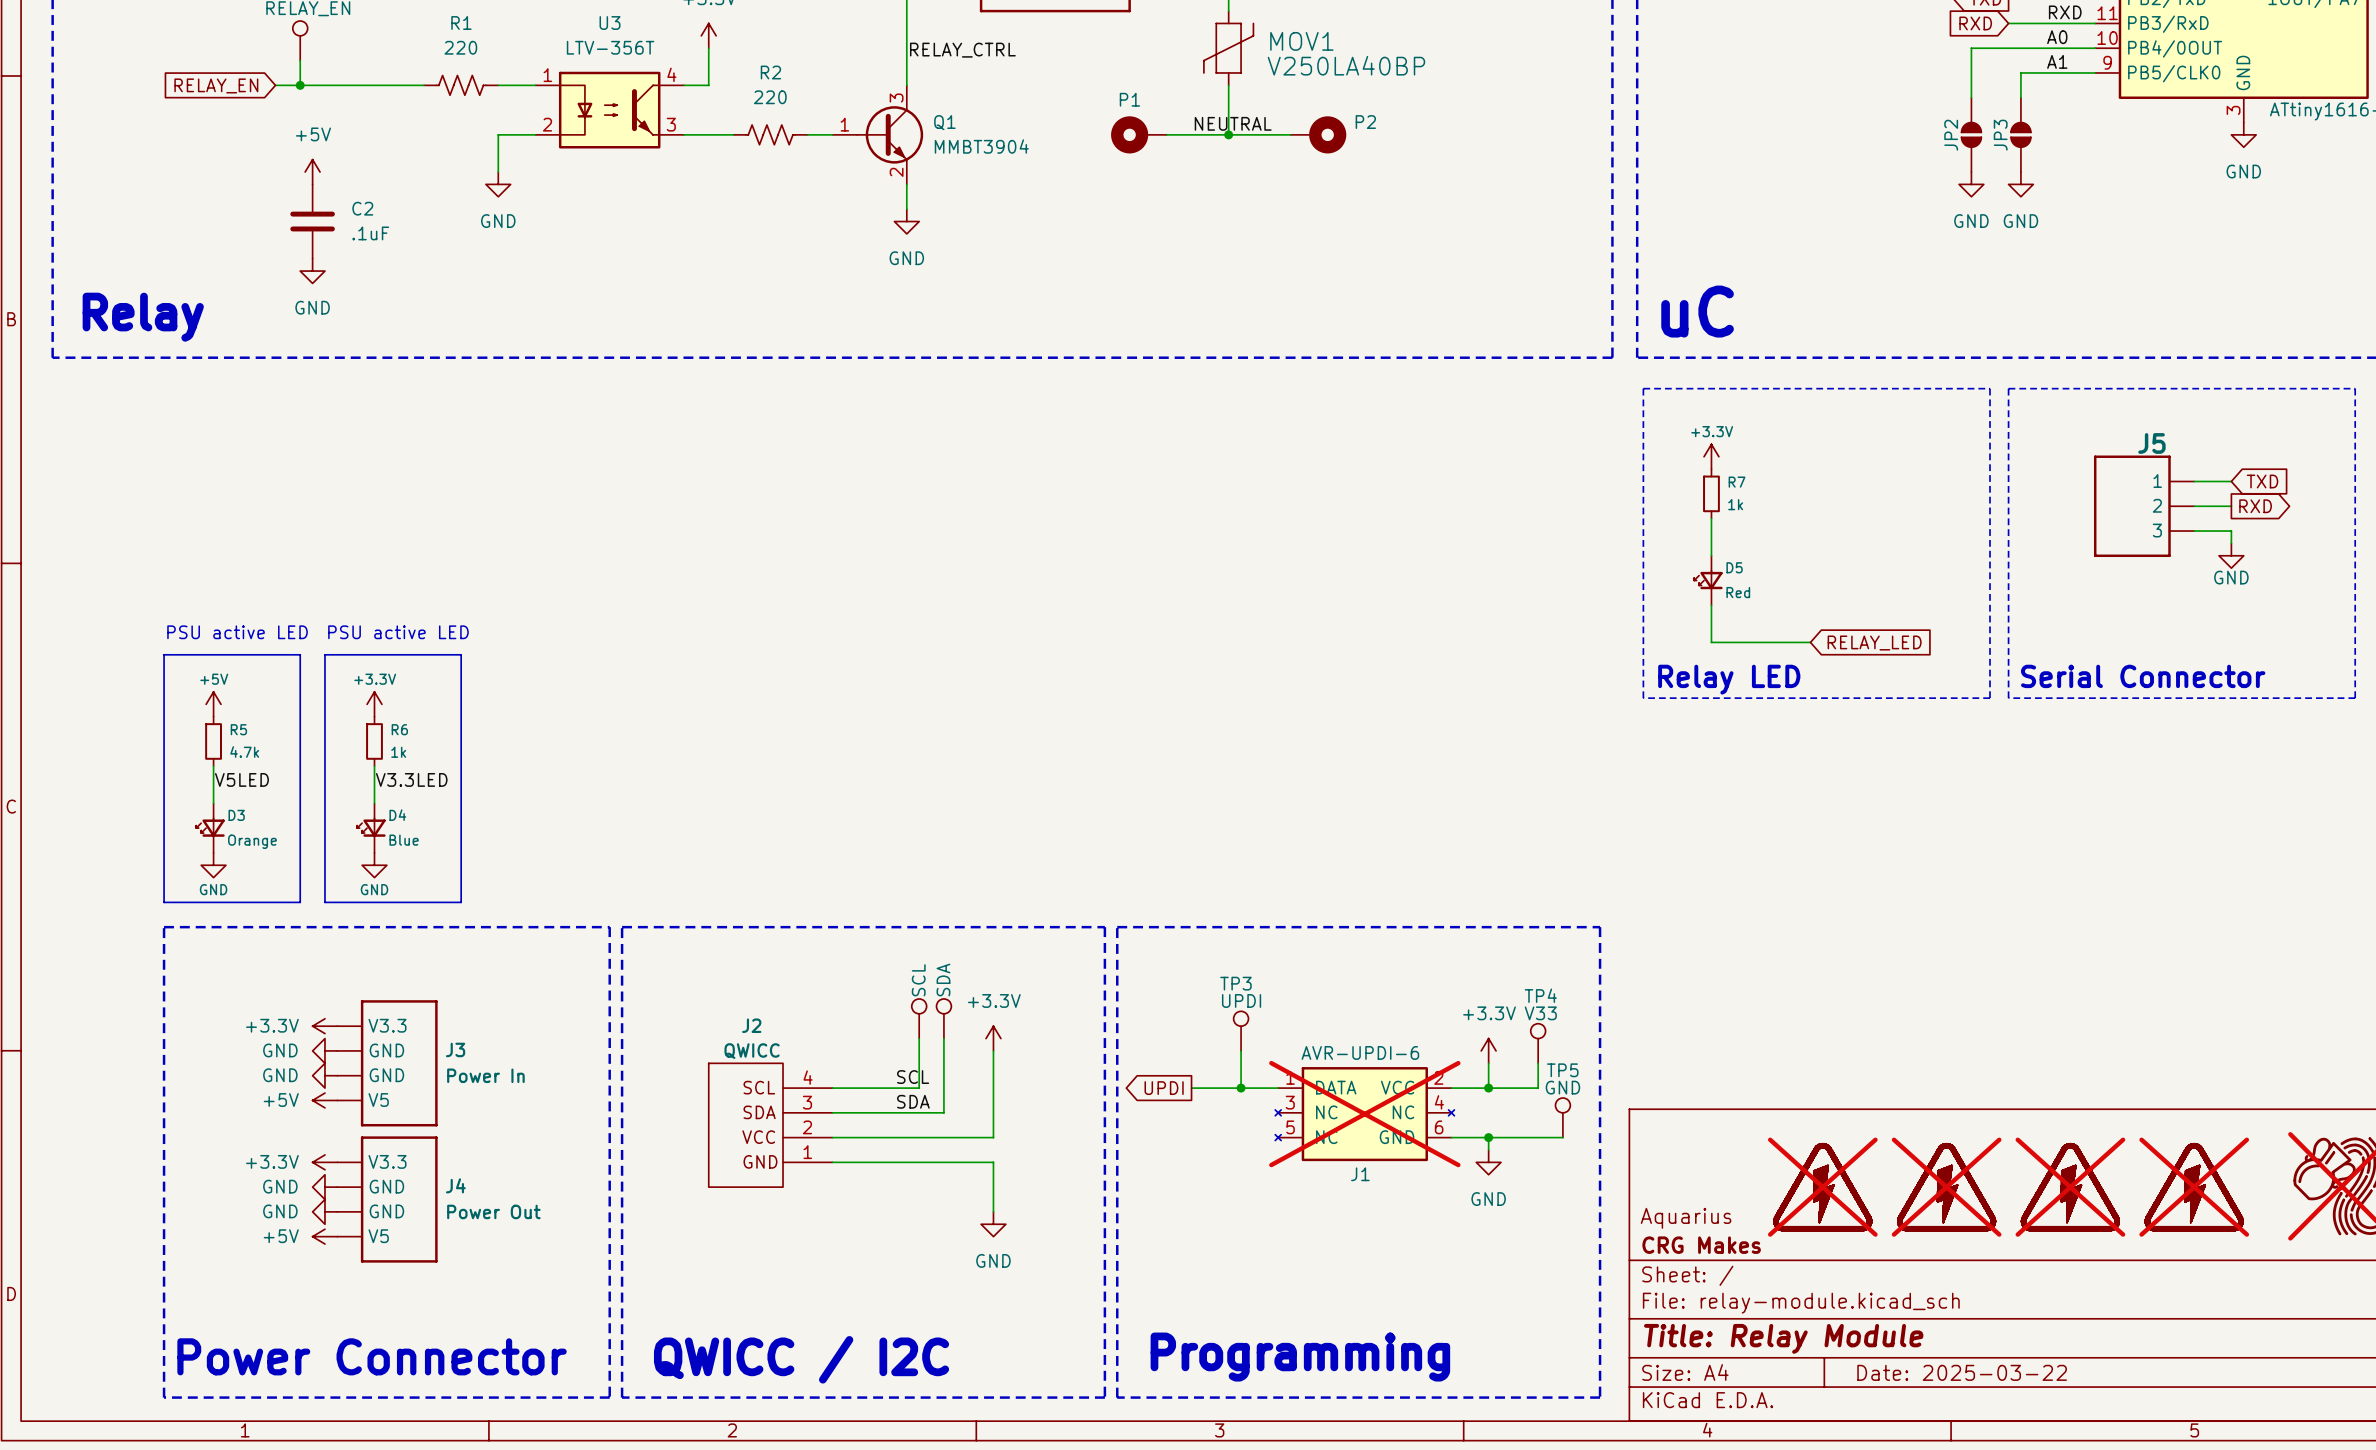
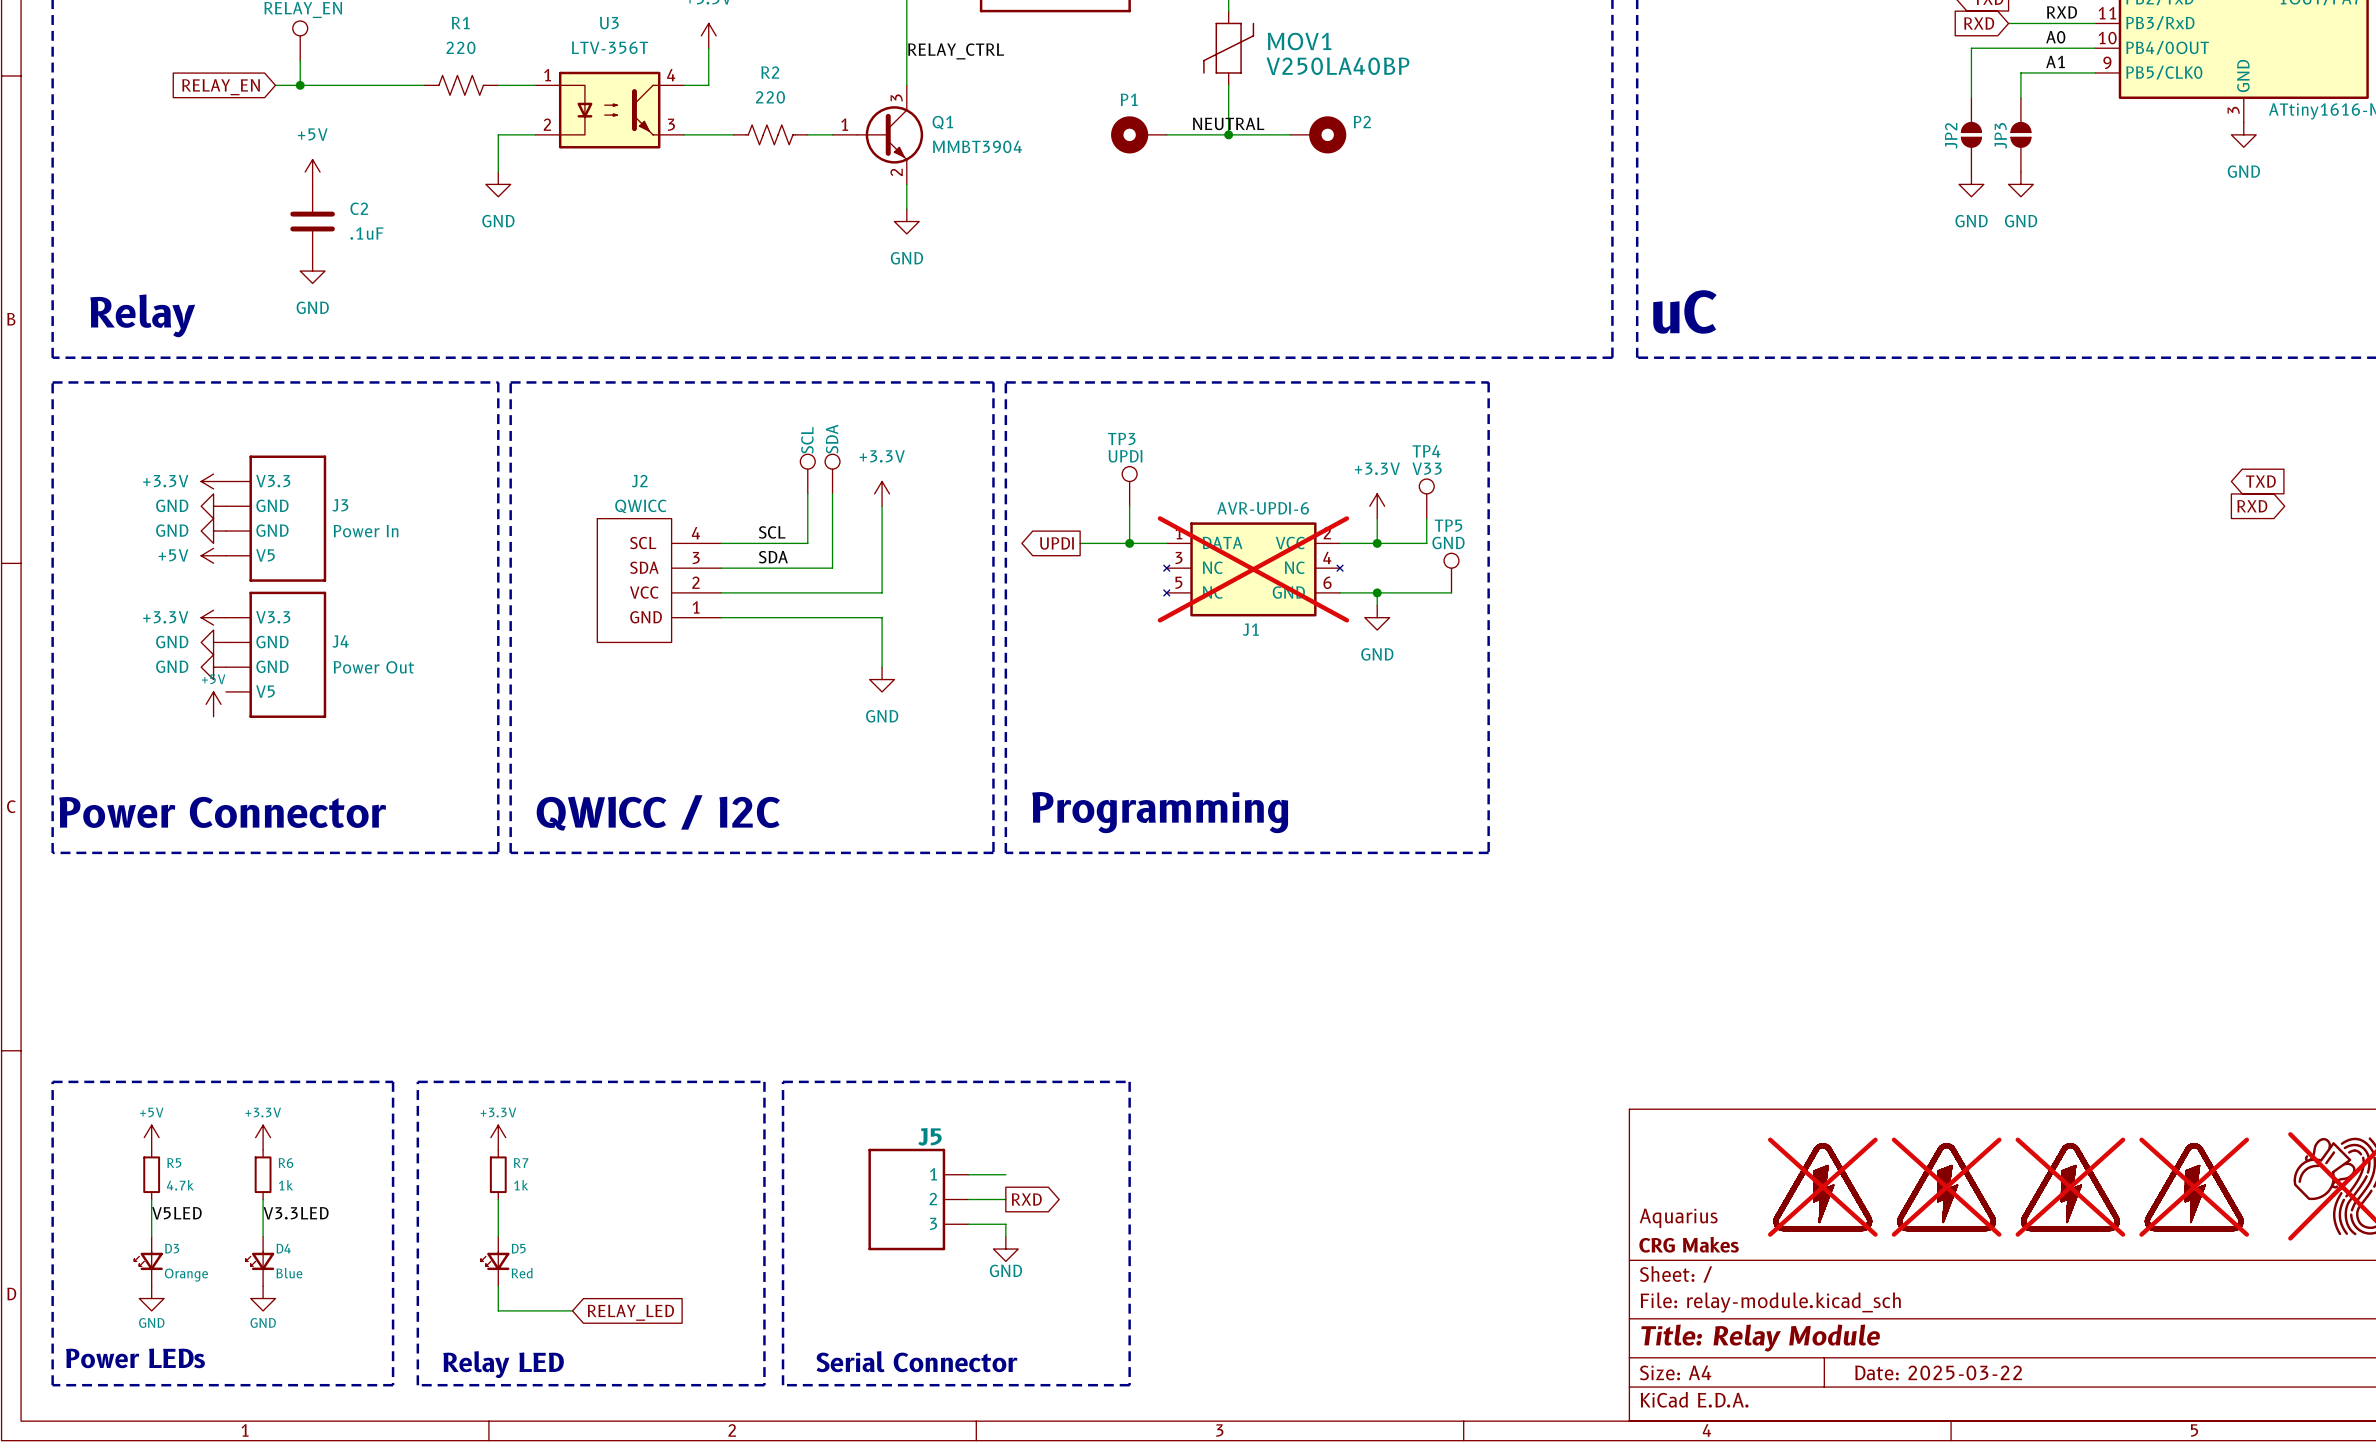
line: none -> (52, 382) (498, 382) (498, 852) (52, 852) (52, 382)
line: none -> (510, 382) (993, 382) (993, 852) (510, 852) (510, 382)
line: none -> (1005, 382) (1488, 382) (1488, 852) (1005, 852) (1005, 382)
line: (1643, 388) (1990, 388) (1990, 698) (1643, 698) (1643, 388) -> none
line: (2008, 388) (2355, 388) (2355, 698) (2008, 698) (2008, 388) -> none
power symbol: +3.3V (1711, 456) -> none
part: none -> SCL (807, 474)
part: none -> SDA (832, 474)
power symbol: none -> +3.3V (213, 481)
wire: (2194, 481) (2231, 481) -> none
wire: none -> (807, 493) (807, 543) (721, 543)
wire: none -> (832, 493) (832, 568) (721, 568)
power symbol: none -> +3.3V (882, 493)
R7 position: (1711, 493) -> (498, 1174)
power symbol: none -> GND (213, 506)
wire: none -> (882, 506) (882, 592) (721, 592)
wire: none -> (1129, 506) (1129, 543)
power symbol: none -> +3.3V (1377, 506)
J5 position: (2144, 506) -> (918, 1199)
wire: (2194, 506) (2231, 506) -> none
wire: none -> (1377, 518) (1377, 543)
wire: none -> (1426, 518) (1426, 543) (1340, 543)
wire: (1711, 518) (1711, 555) -> none
power symbol: none -> GND (213, 531)
wire: (2194, 531) (2231, 531) (2231, 543) -> none
label: none -> SCL (772, 532)
global label: none -> UPDI (1056, 543)
wire: none -> (1080, 543) (1166, 543)
junction: none -> (1129, 543)
junction: none -> (1377, 543)
power symbol: none -> +5V (213, 555)
power symbol: GND (2231, 555) -> none
label: none -> SDA (773, 557)
D5 position: (1708, 580) -> (495, 1261)
wire: none -> (1340, 592) (1451, 592)
wire: none -> (1377, 592) (1377, 605)
junction: none -> (1377, 592)
wire: (1711, 605) (1711, 642) (1810, 642) -> none
power symbol: none -> +3.3V (213, 617)
wire: none -> (721, 617) (882, 617) (882, 667)
power symbol: none -> GND (1377, 617)
text: PSU active LED (237, 632) -> none
text: PSU active LED (398, 632) -> none
power symbol: none -> GND (213, 642)
global label: RELAY_LED (1874, 643) -> none
line: (164, 654) (300, 654) (300, 902) (164, 902) (164, 654) -> none
line: (324, 654) (324, 902) (461, 902) (461, 654) (324, 654) -> none
power symbol: none -> GND (213, 667)
text: Serial Connector (2143, 676) -> none
power symbol: none -> GND (882, 679)
text: Relay LED (1729, 679) -> none
power symbol: +3.3V (374, 704) -> none
R5 position: (213, 741) -> (151, 1174)
R6 position: (374, 741) -> (263, 1174)
wire: (213, 766) (213, 803) -> none
wire: (374, 766) (374, 803) -> none
label: V5LED (241, 779) -> none
label: V3.3LED (411, 779) -> none
text: none -> Power Connector (222, 812)
text: none -> Programming (1160, 812)
text: none -> QWICC / I2C (658, 812)
D3 position: (210, 828) -> (148, 1261)
D4 position: (371, 828) -> (259, 1261)
power symbol: GND (213, 865) -> none
power symbol: GND (374, 865) -> none
line: (164, 927) (609, 927) (609, 1397) (164, 1397) (164, 927) -> none
line: (622, 927) (1104, 927) (1104, 1397) (622, 1397) (622, 927) -> none
line: (1117, 927) (1600, 927) (1600, 1397) (1117, 1397) (1117, 927) -> none
part: SCL (919, 1018) -> none
part: SDA (943, 1018) -> none
power symbol: +3.3V (324, 1026) -> none
TP3 position: (1241, 1031) -> (1129, 486)
wire: (919, 1038) (919, 1088) (832, 1088) -> none
wire: (943, 1038) (943, 1112) (832, 1112) -> none
power symbol: +3.3V (993, 1038) -> none
TP4 position: (1538, 1043) -> (1426, 498)
power symbol: GND (324, 1050) -> none
wire: (993, 1050) (993, 1137) (832, 1137) -> none
wire: (1241, 1050) (1241, 1088) -> none
power symbol: +3.3V (1488, 1050) -> none
J3 position: (387, 1063) -> (276, 518)
wire: (1488, 1063) (1488, 1088) -> none
wire: (1538, 1063) (1538, 1088) (1451, 1088) -> none
power symbol: GND (324, 1075) -> none
label: SCL (913, 1077) -> none
line: none -> (52, 1081) (393, 1081) (393, 1385) (52, 1385) (52, 1081)
line: none -> (417, 1081) (764, 1081) (764, 1385) (417, 1385) (417, 1081)
line: none -> (783, 1081) (1129, 1081) (1129, 1385) (783, 1385) (783, 1081)
global label: UPDI (1164, 1088) -> none
wire: (1191, 1088) (1278, 1088) -> none
junction: (1241, 1088) -> none
junction: (1488, 1088) -> none
power symbol: +5V (324, 1100) -> none
label: SDA (913, 1101) -> none
J1 position: (1364, 1114) -> (1253, 569)
TP5 position: (1562, 1117) -> (1451, 573)
J2 position: (770, 1125) -> (659, 580)
power symbol: none -> +5V (151, 1137)
power symbol: none -> +3.3V (263, 1137)
power symbol: none -> +3.3V (498, 1137)
wire: (1451, 1137) (1562, 1137) -> none
wire: (1488, 1137) (1488, 1149) -> none
junction: (1488, 1137) -> none
power symbol: +3.3V (324, 1162) -> none
wire: (832, 1162) (993, 1162) (993, 1211) -> none
power symbol: GND (1488, 1162) -> none
wire: none -> (968, 1174) (1005, 1174)
power symbol: GND (324, 1187) -> none
wire: none -> (151, 1199) (151, 1236)
wire: none -> (263, 1199) (263, 1236)
J4 position: (387, 1199) -> (276, 654)
wire: none -> (498, 1199) (498, 1236)
wire: none -> (968, 1199) (1005, 1199)
global label: none -> RXD (1026, 1199)
power symbol: GND (324, 1211) -> none
label: none -> V5LED (176, 1213)
label: none -> V3.3LED (296, 1213)
wire: none -> (968, 1224) (1005, 1224) (1005, 1236)
power symbol position: GND (993, 1224) -> GND (1005, 1249)
power symbol: +5V (324, 1236) -> none
power symbol text position: GND (993, 1260) -> GND (1005, 1270)
wire: none -> (498, 1286) (498, 1310) (572, 1310)
power symbol: none -> GND (151, 1298)
power symbol: none -> GND (263, 1298)
global label: none -> RELAY_LED (630, 1312)
text: Power Connector (372, 1356) -> none
text: Programming (1300, 1357) -> none
text: none -> Power LEDs (135, 1358)
text: QWICC / I2C (801, 1359) -> none
text: none -> Serial Connector (916, 1361)
text: none -> Relay LED (503, 1364)

